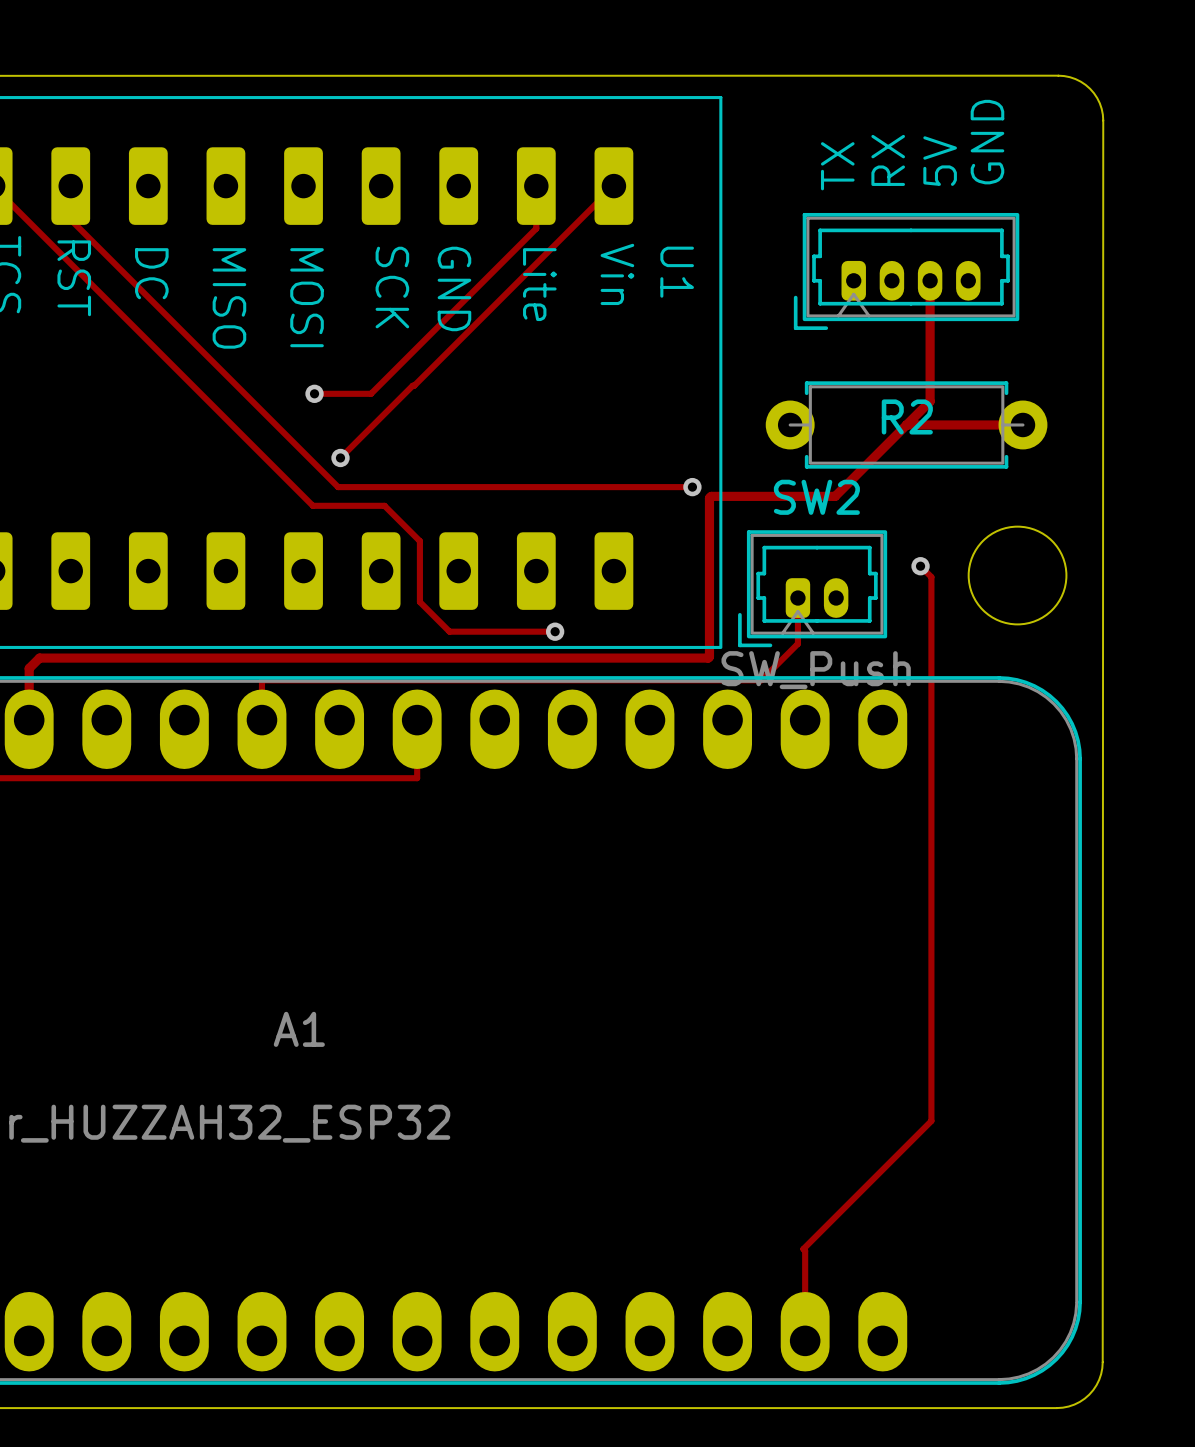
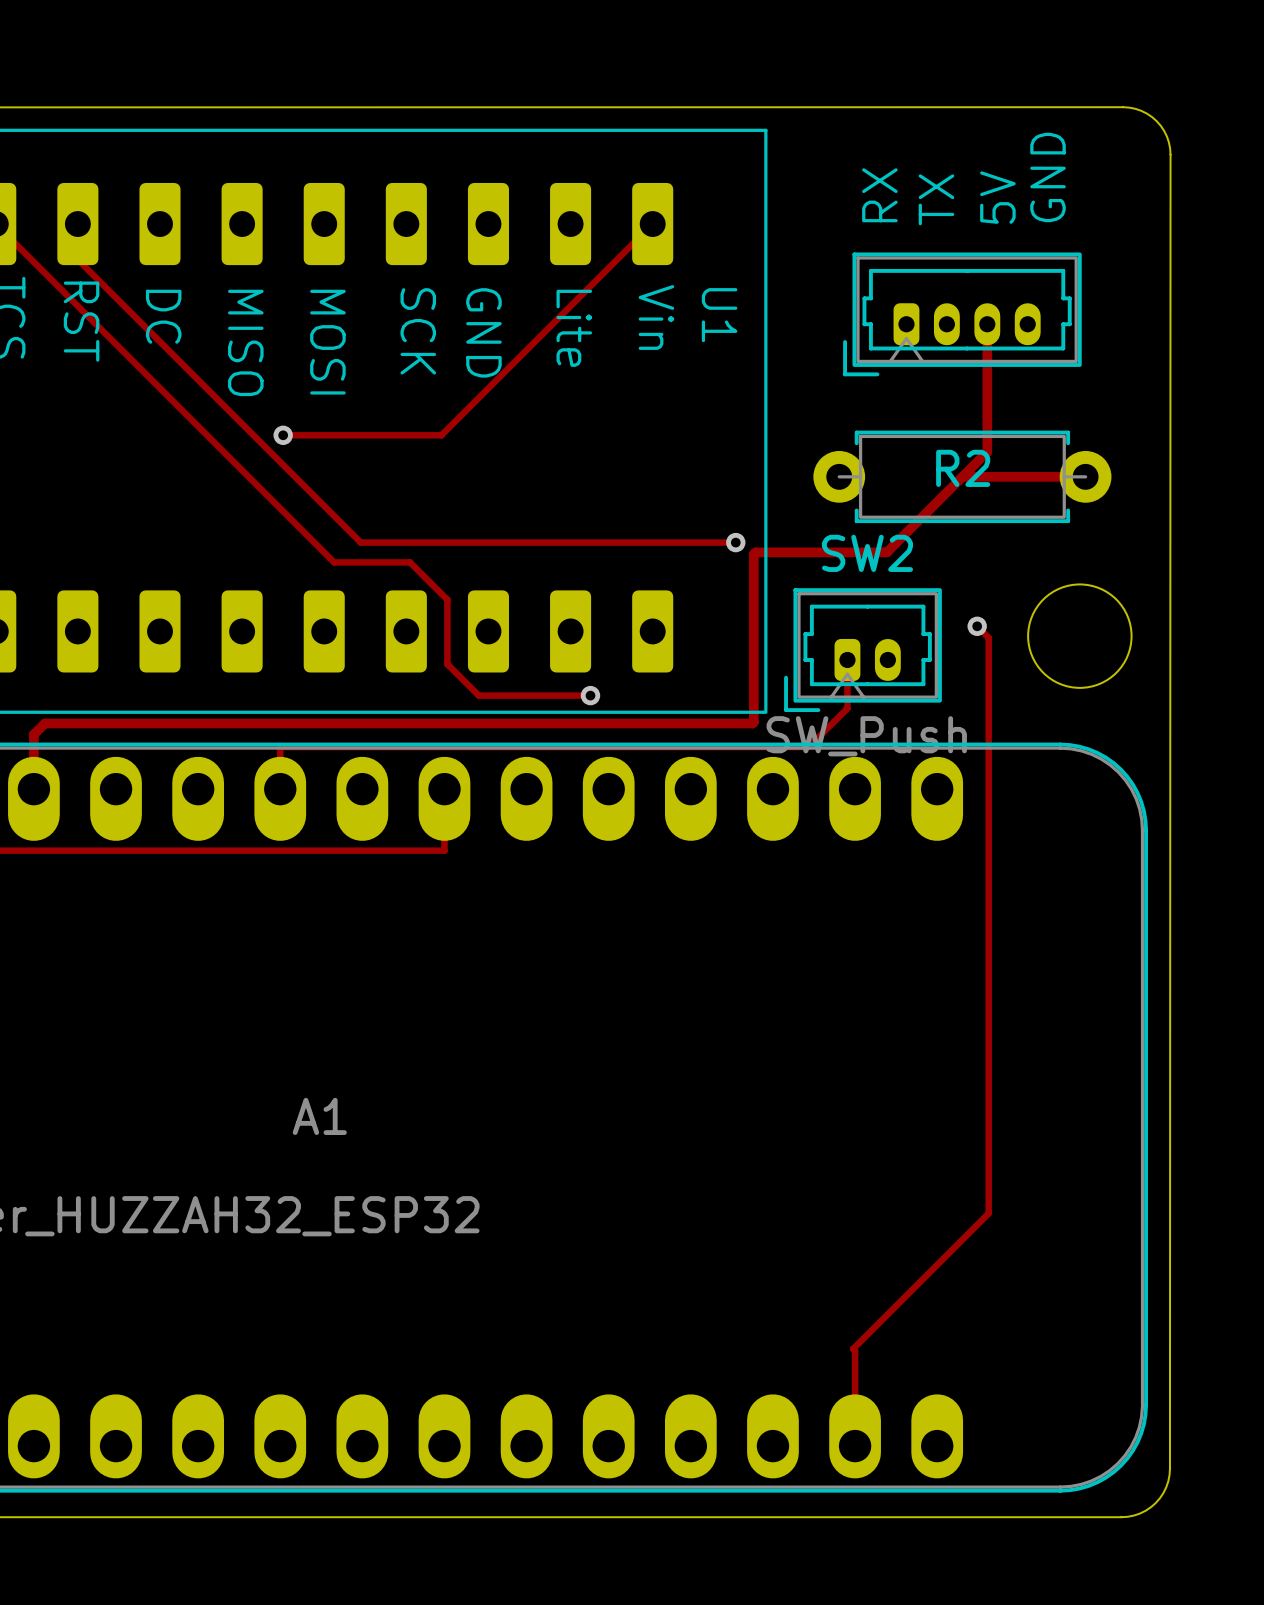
text: RX (888, 160) -> TX (936, 199)
text: TX (837, 166) -> RX (879, 195)
track: (536, 186) (536, 228) (371, 393) (314, 393) -> none
track: (412, 385) (340, 457) -> (439, 435) (283, 435)
via position: (314, 393) -> (283, 435)
via: (340, 457) -> none

